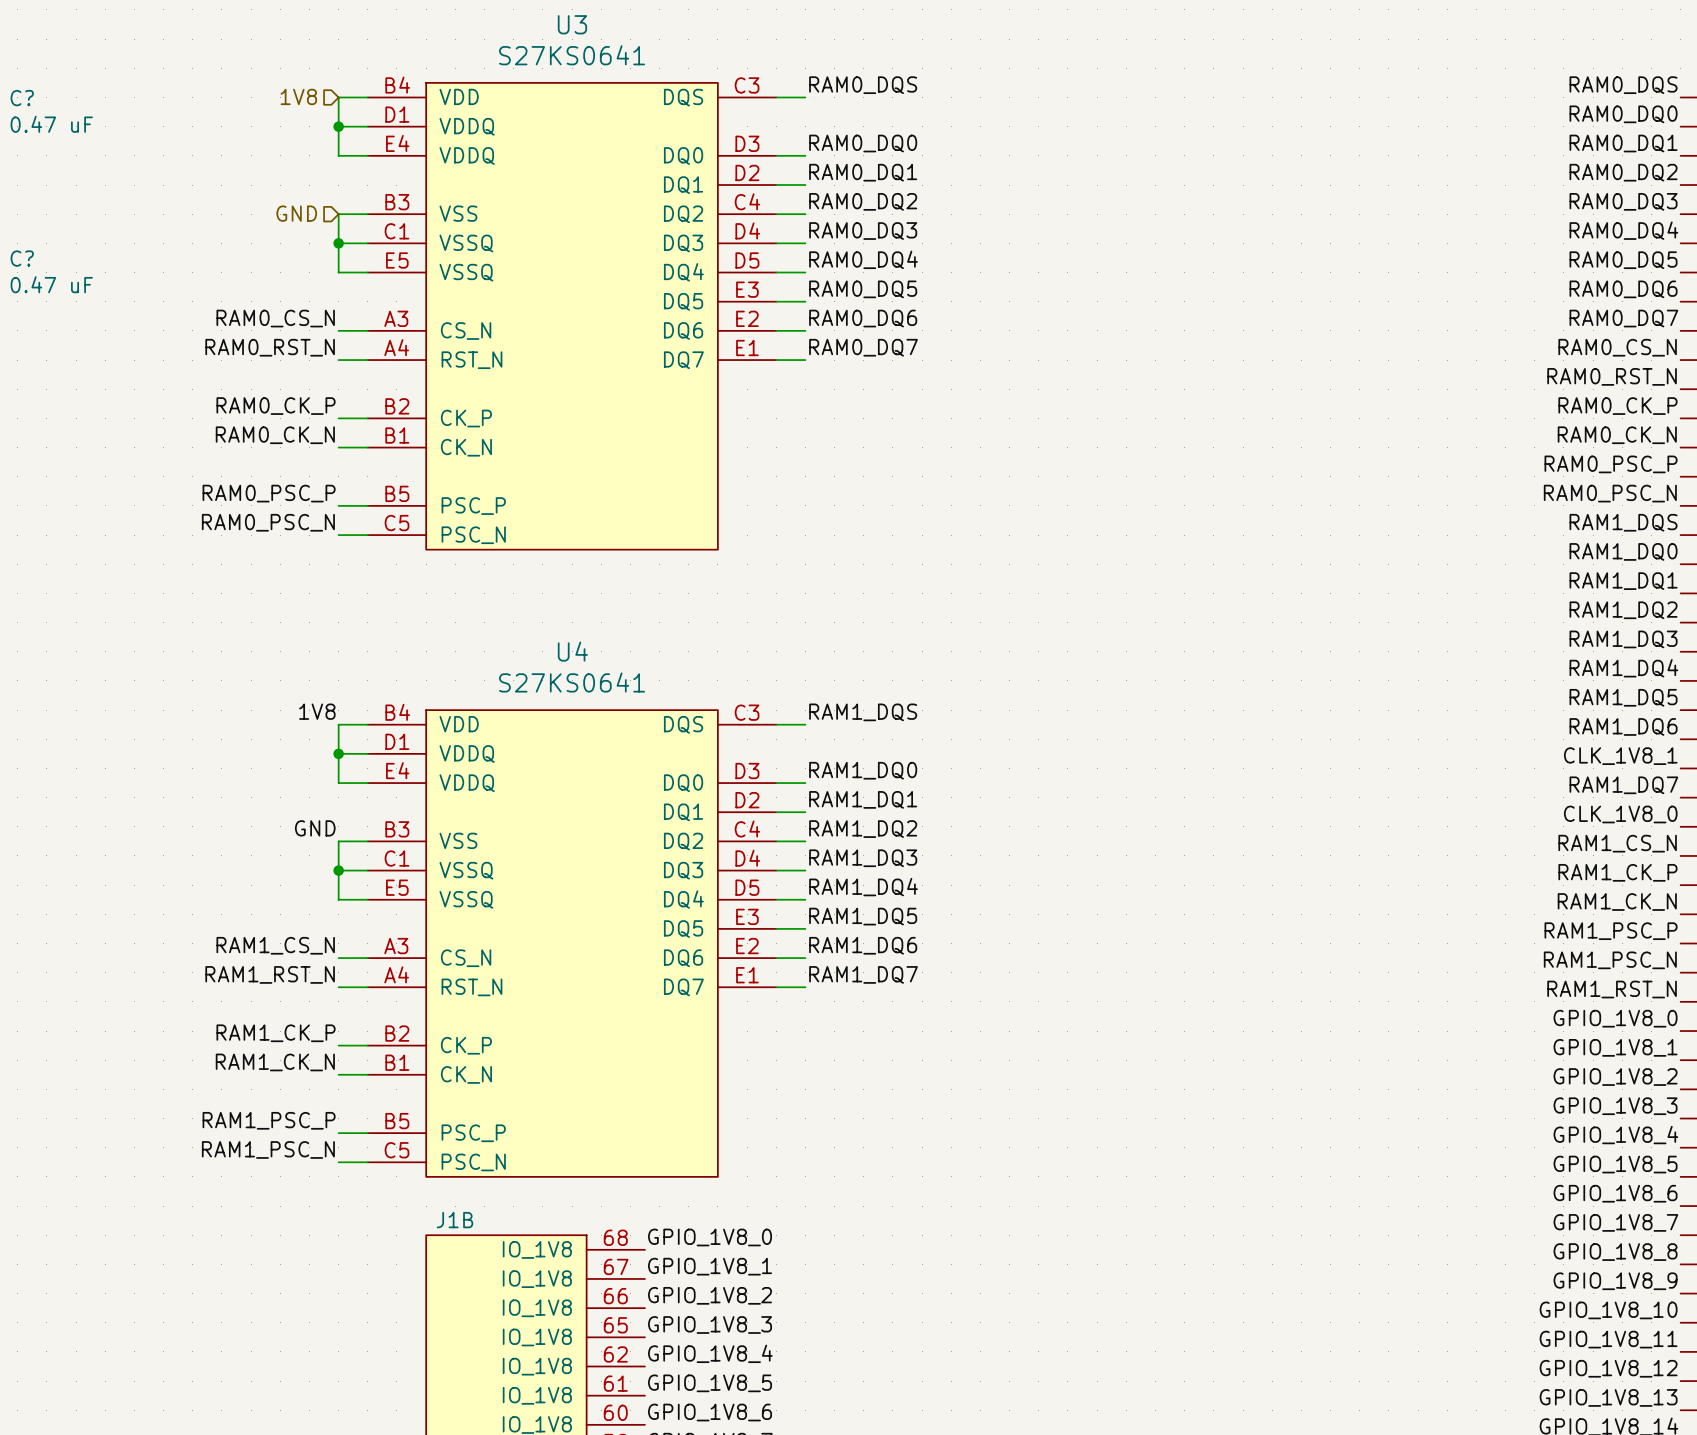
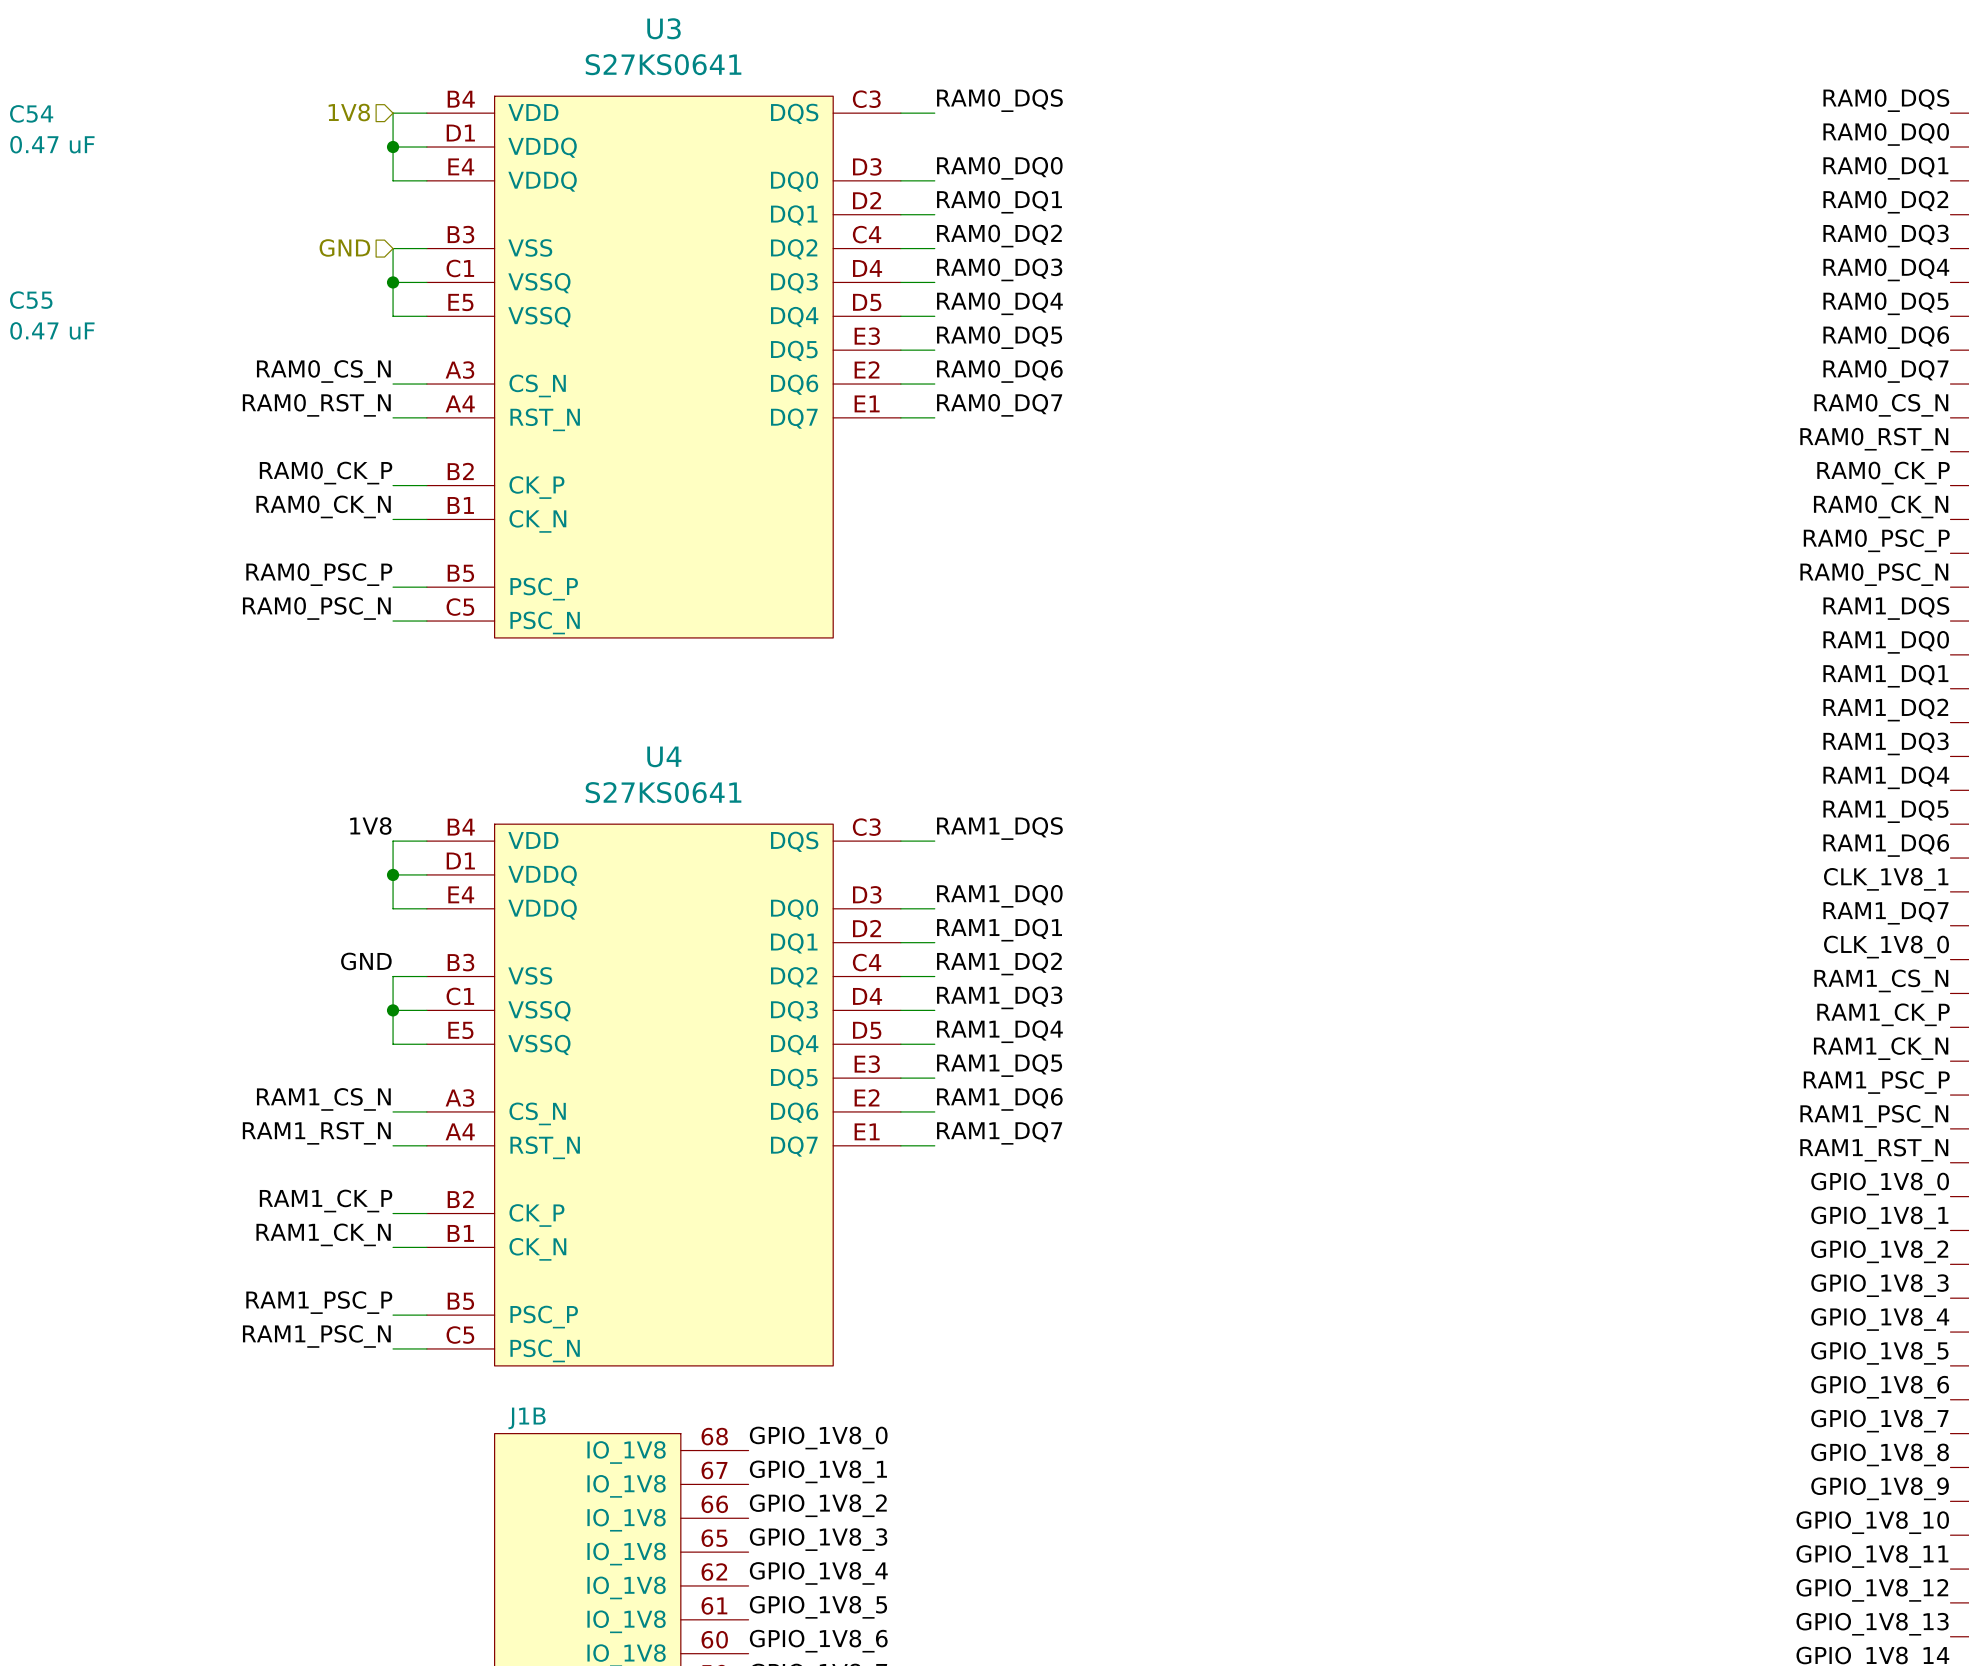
C? name: C? (22, 98) -> C54 (31, 113)
C? name: C? (22, 258) -> C55 (31, 300)

